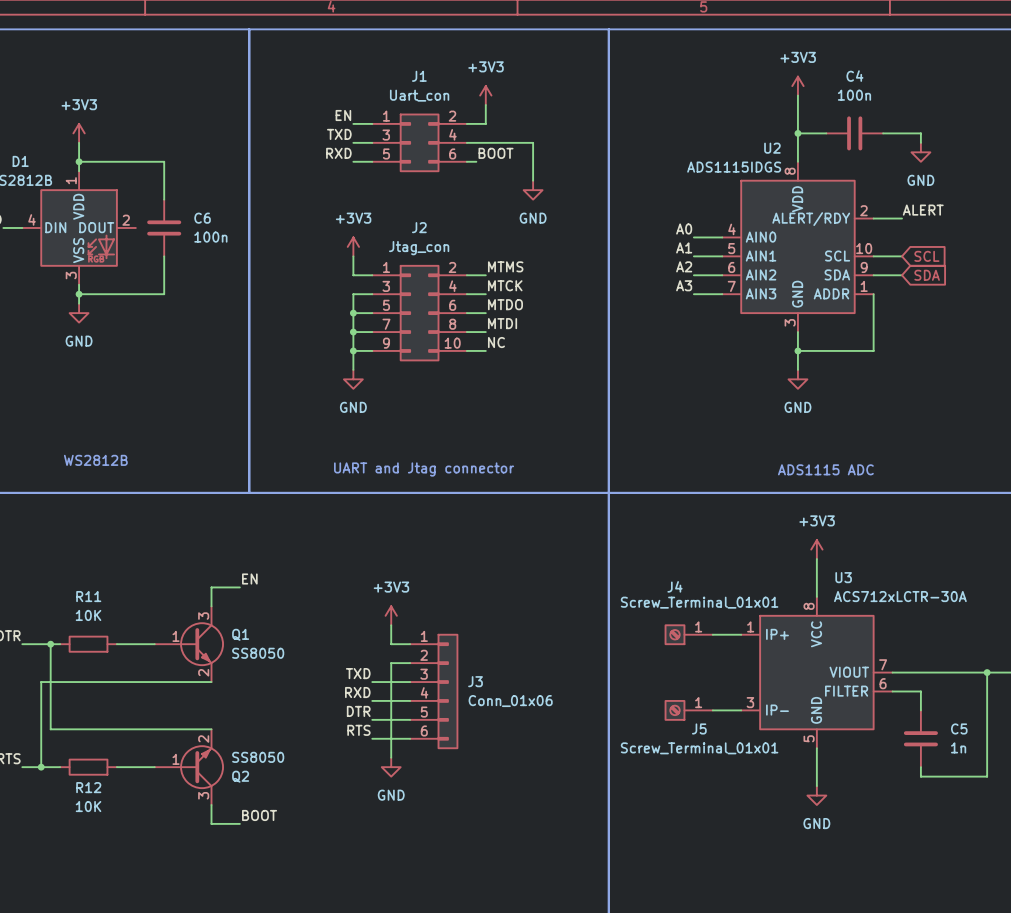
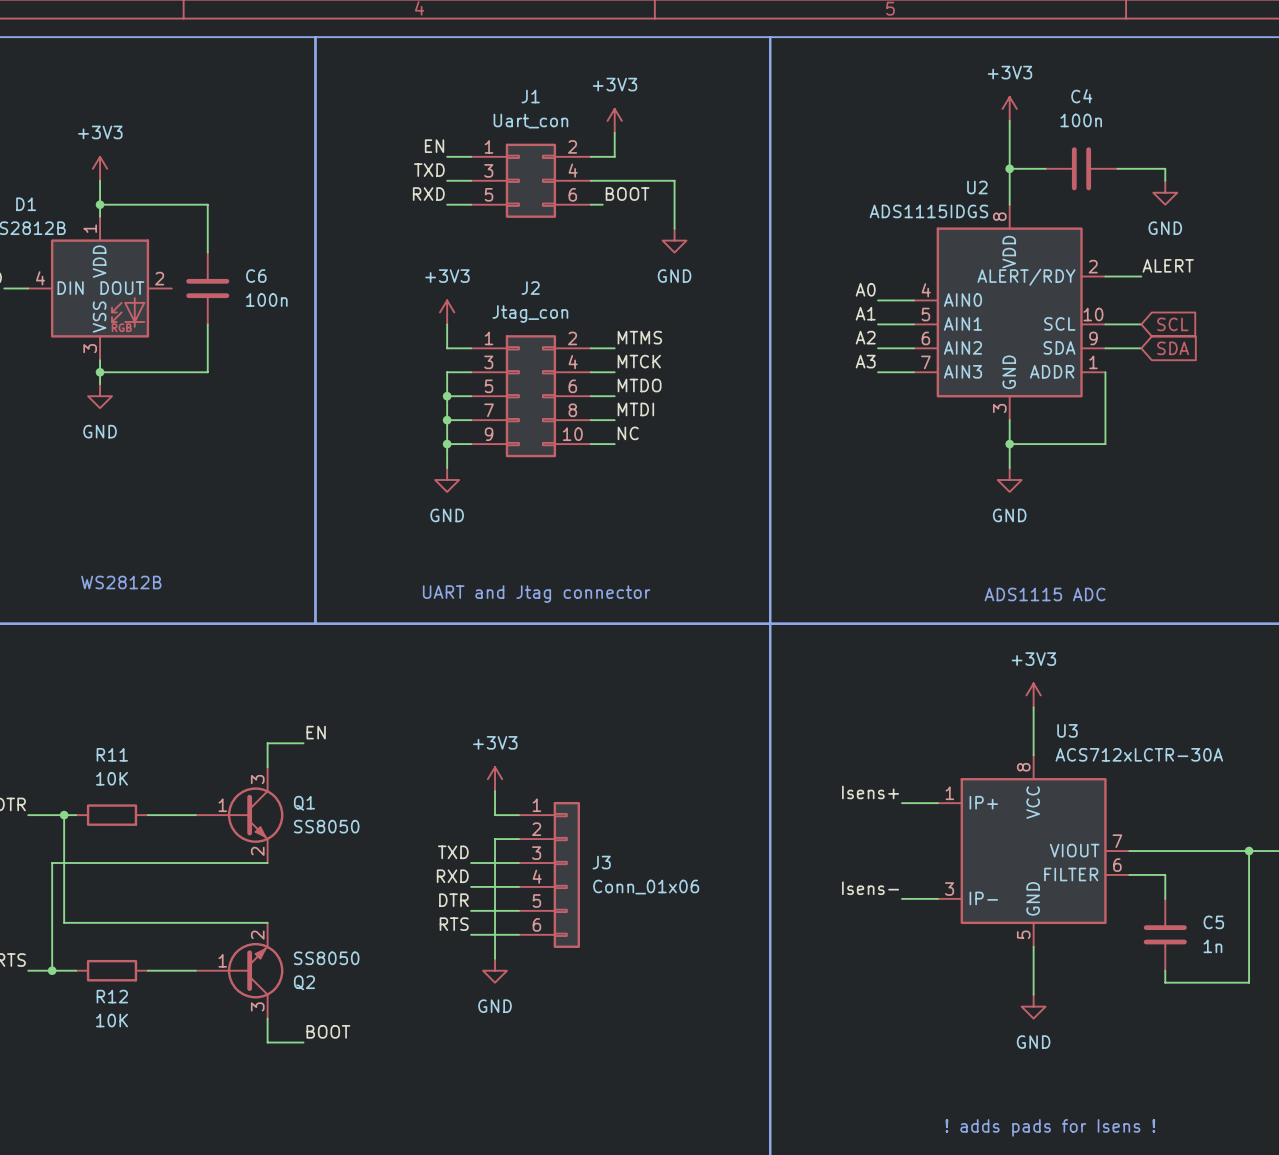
label: none -> Isens+ (870, 792)
J4: Screw_Terminal_01x01 (688, 634) -> none
label: none -> Isens- (870, 888)
J5: Screw_Terminal_01x01 (688, 710) -> none
text: none -> ! adds pads for Isens ! (1050, 1127)

